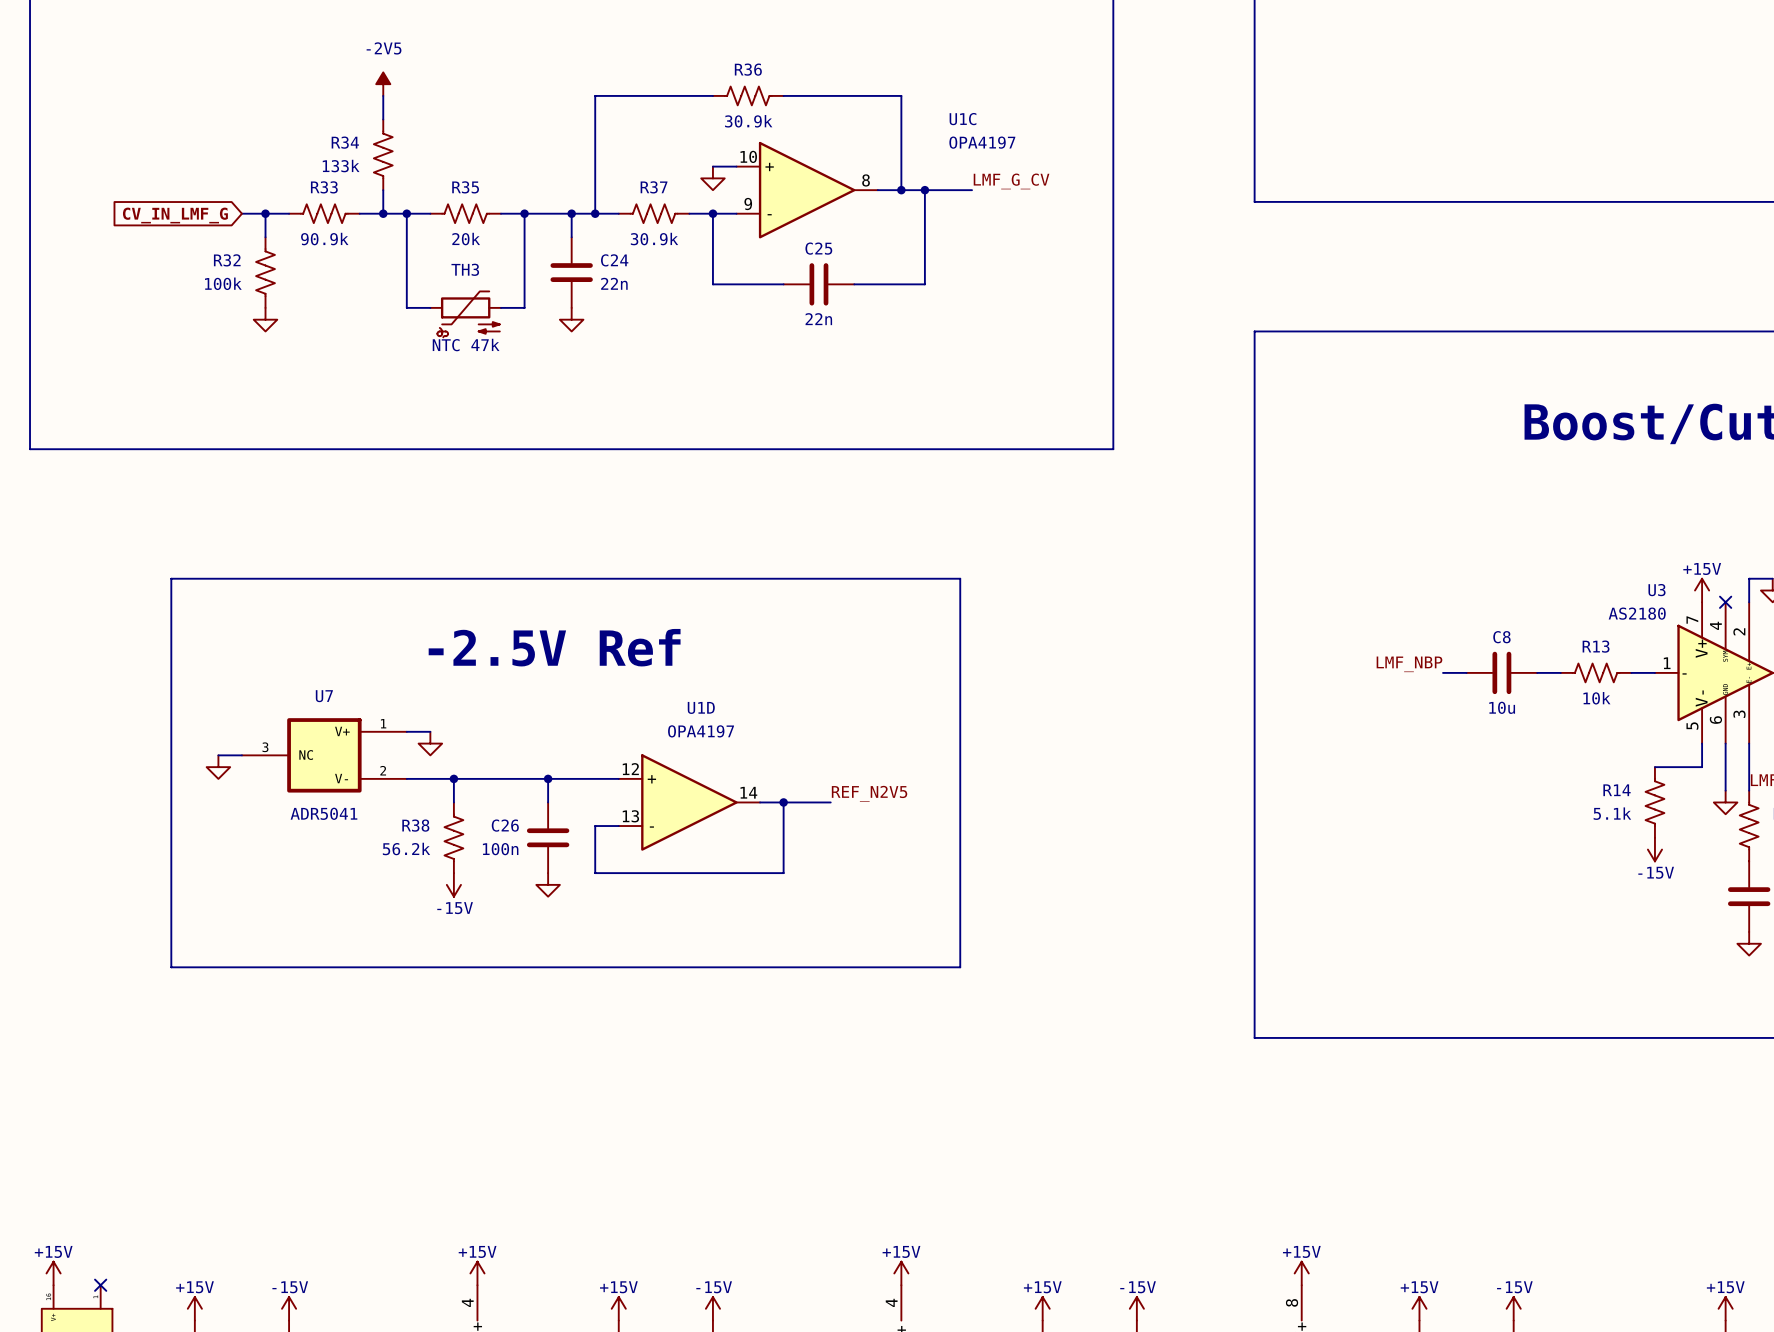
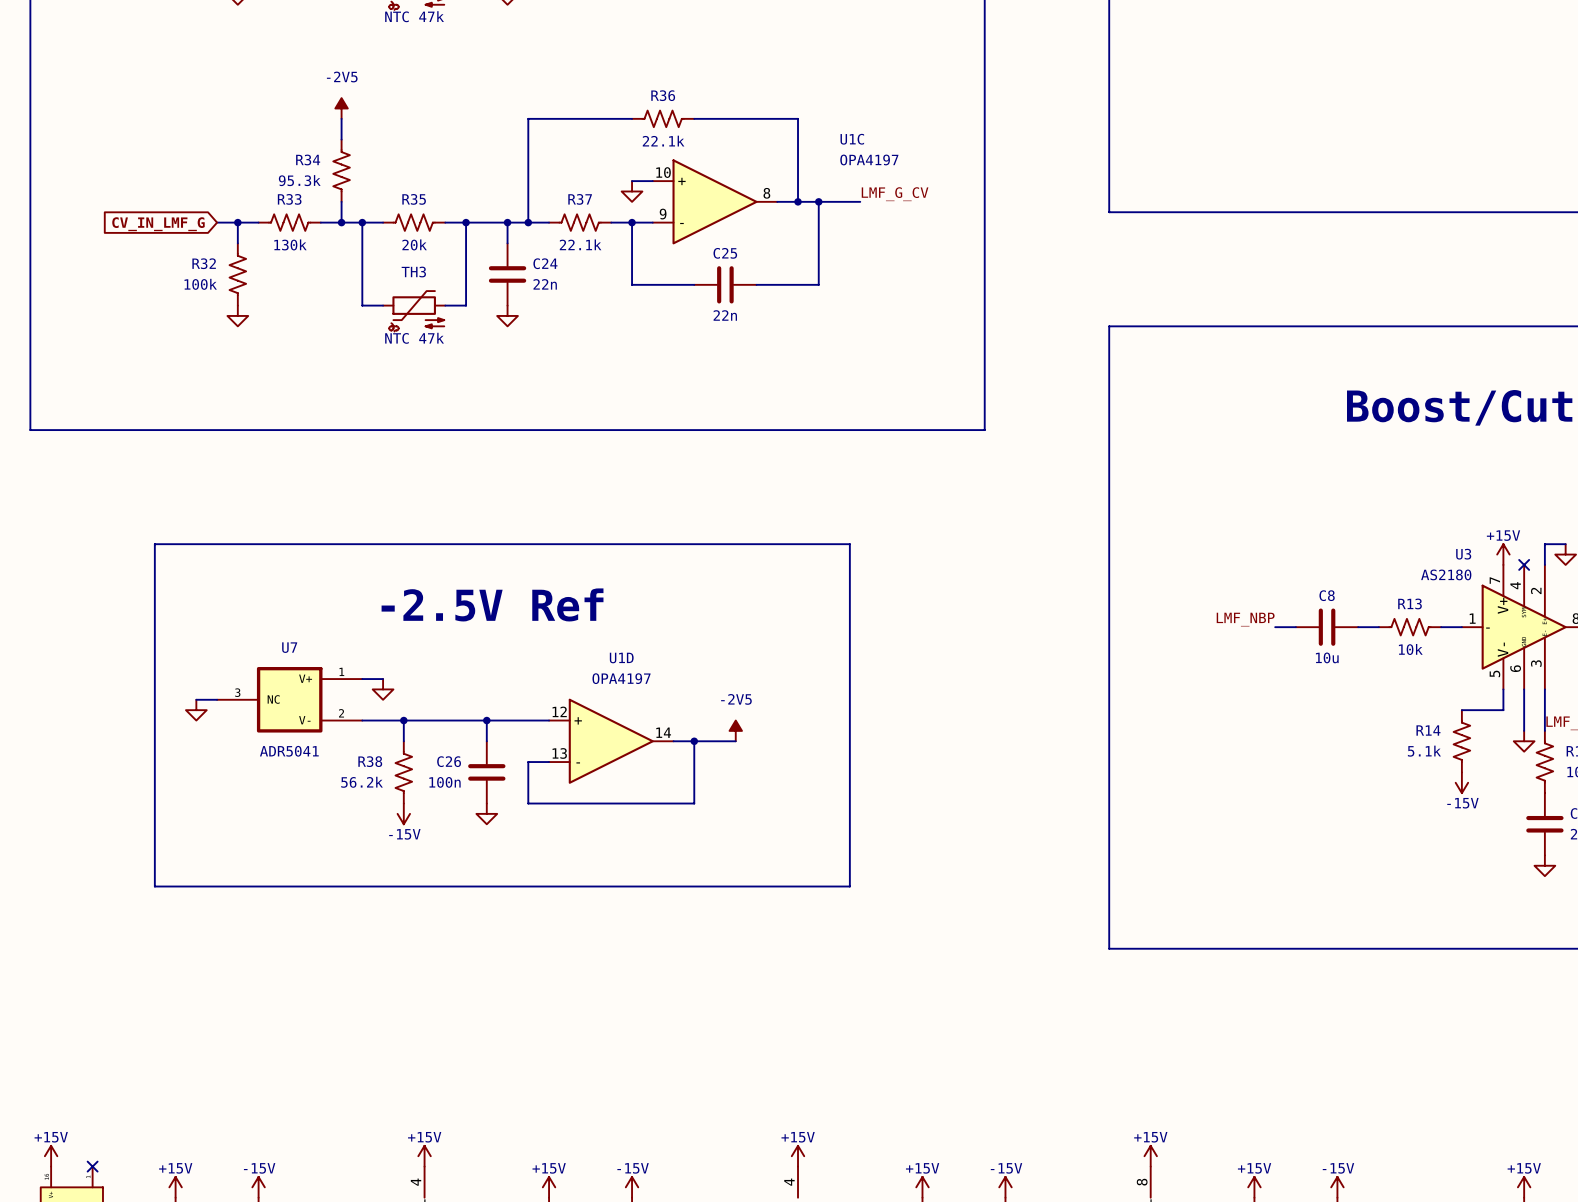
R36 value: 30.9k (748, 121) -> 22.1k (663, 141)
R34 value: 133k (341, 166) -> 95.3k (299, 180)
R33 value: 90.9k (324, 239) -> 130k (290, 244)
R37 value: 30.9k (654, 239) -> 22.1k (580, 244)
power symbol: none -> -2V5 (735, 730)
label: REF_N2V5 (869, 793) -> none

